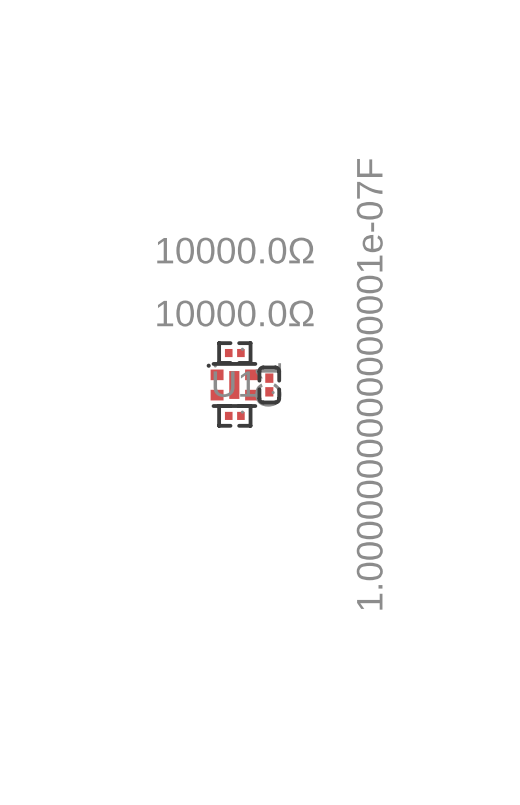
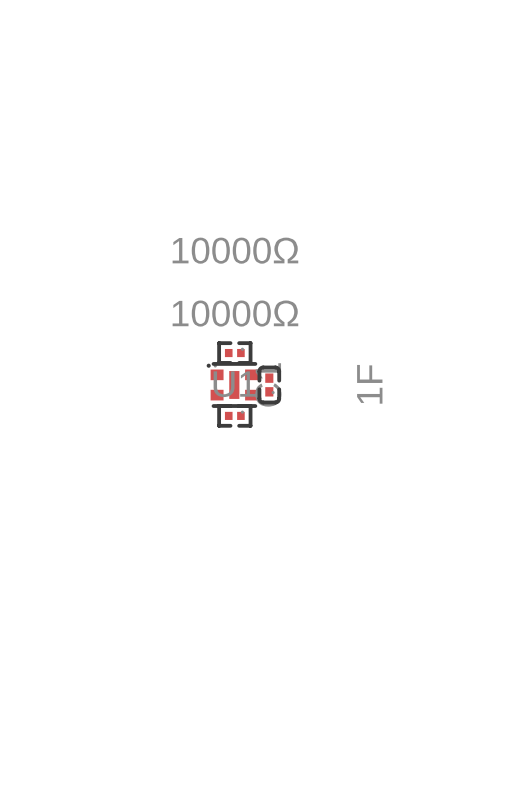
part value: 10000.0Ω (235, 250) -> 10000Ω (235, 250)
part value: 10000.0Ω (235, 313) -> 10000Ω (235, 313)
part value: 1.0000000000000001e-07F (369, 384) -> 1F (369, 384)

